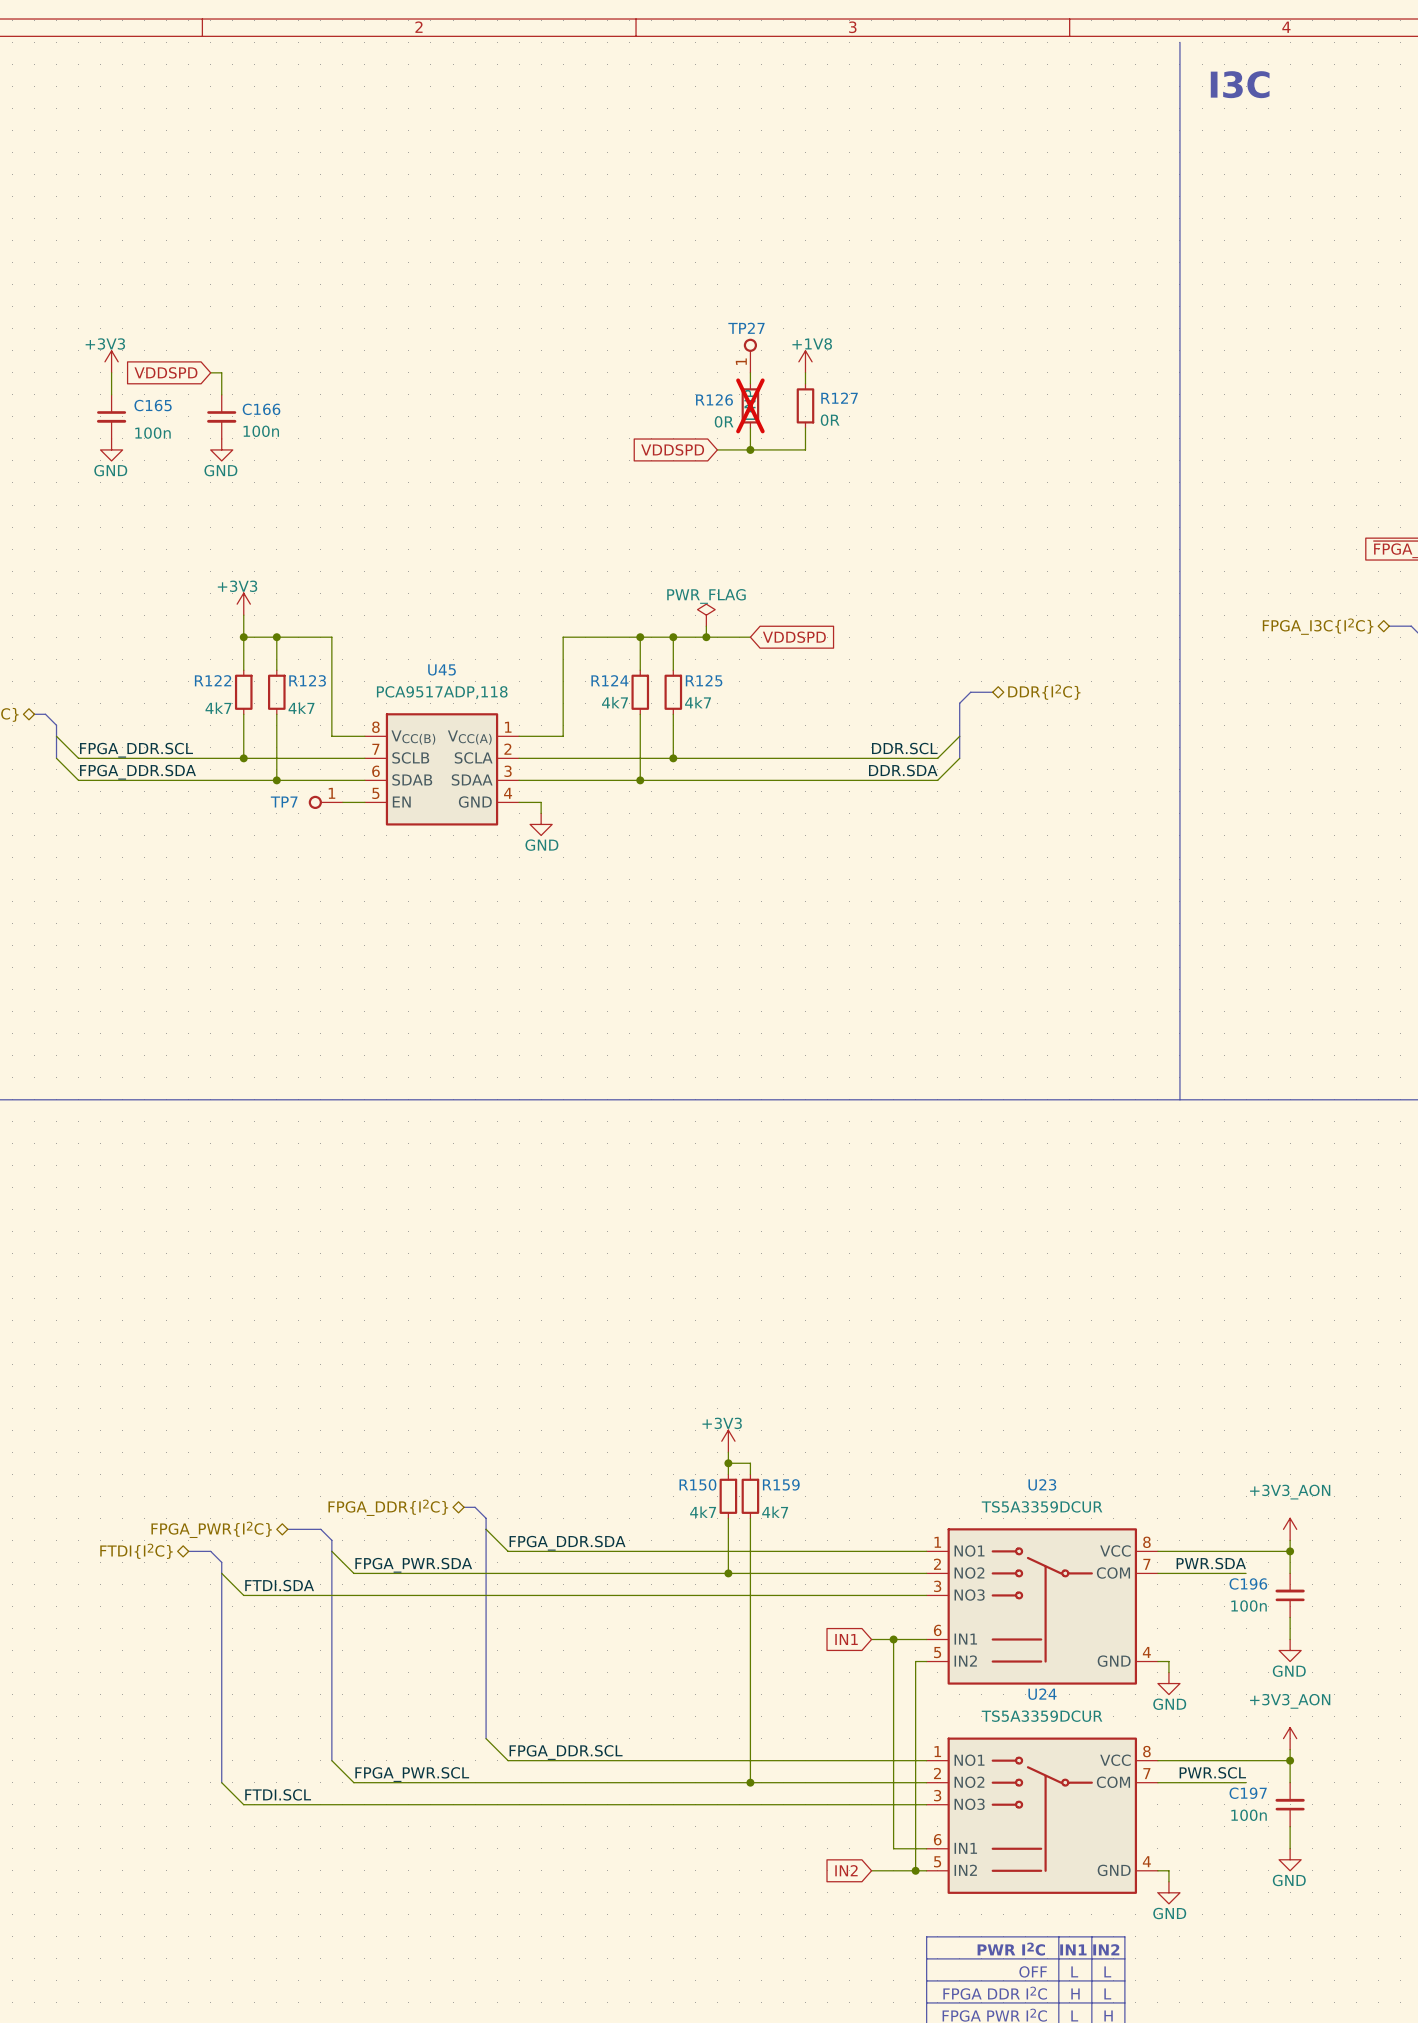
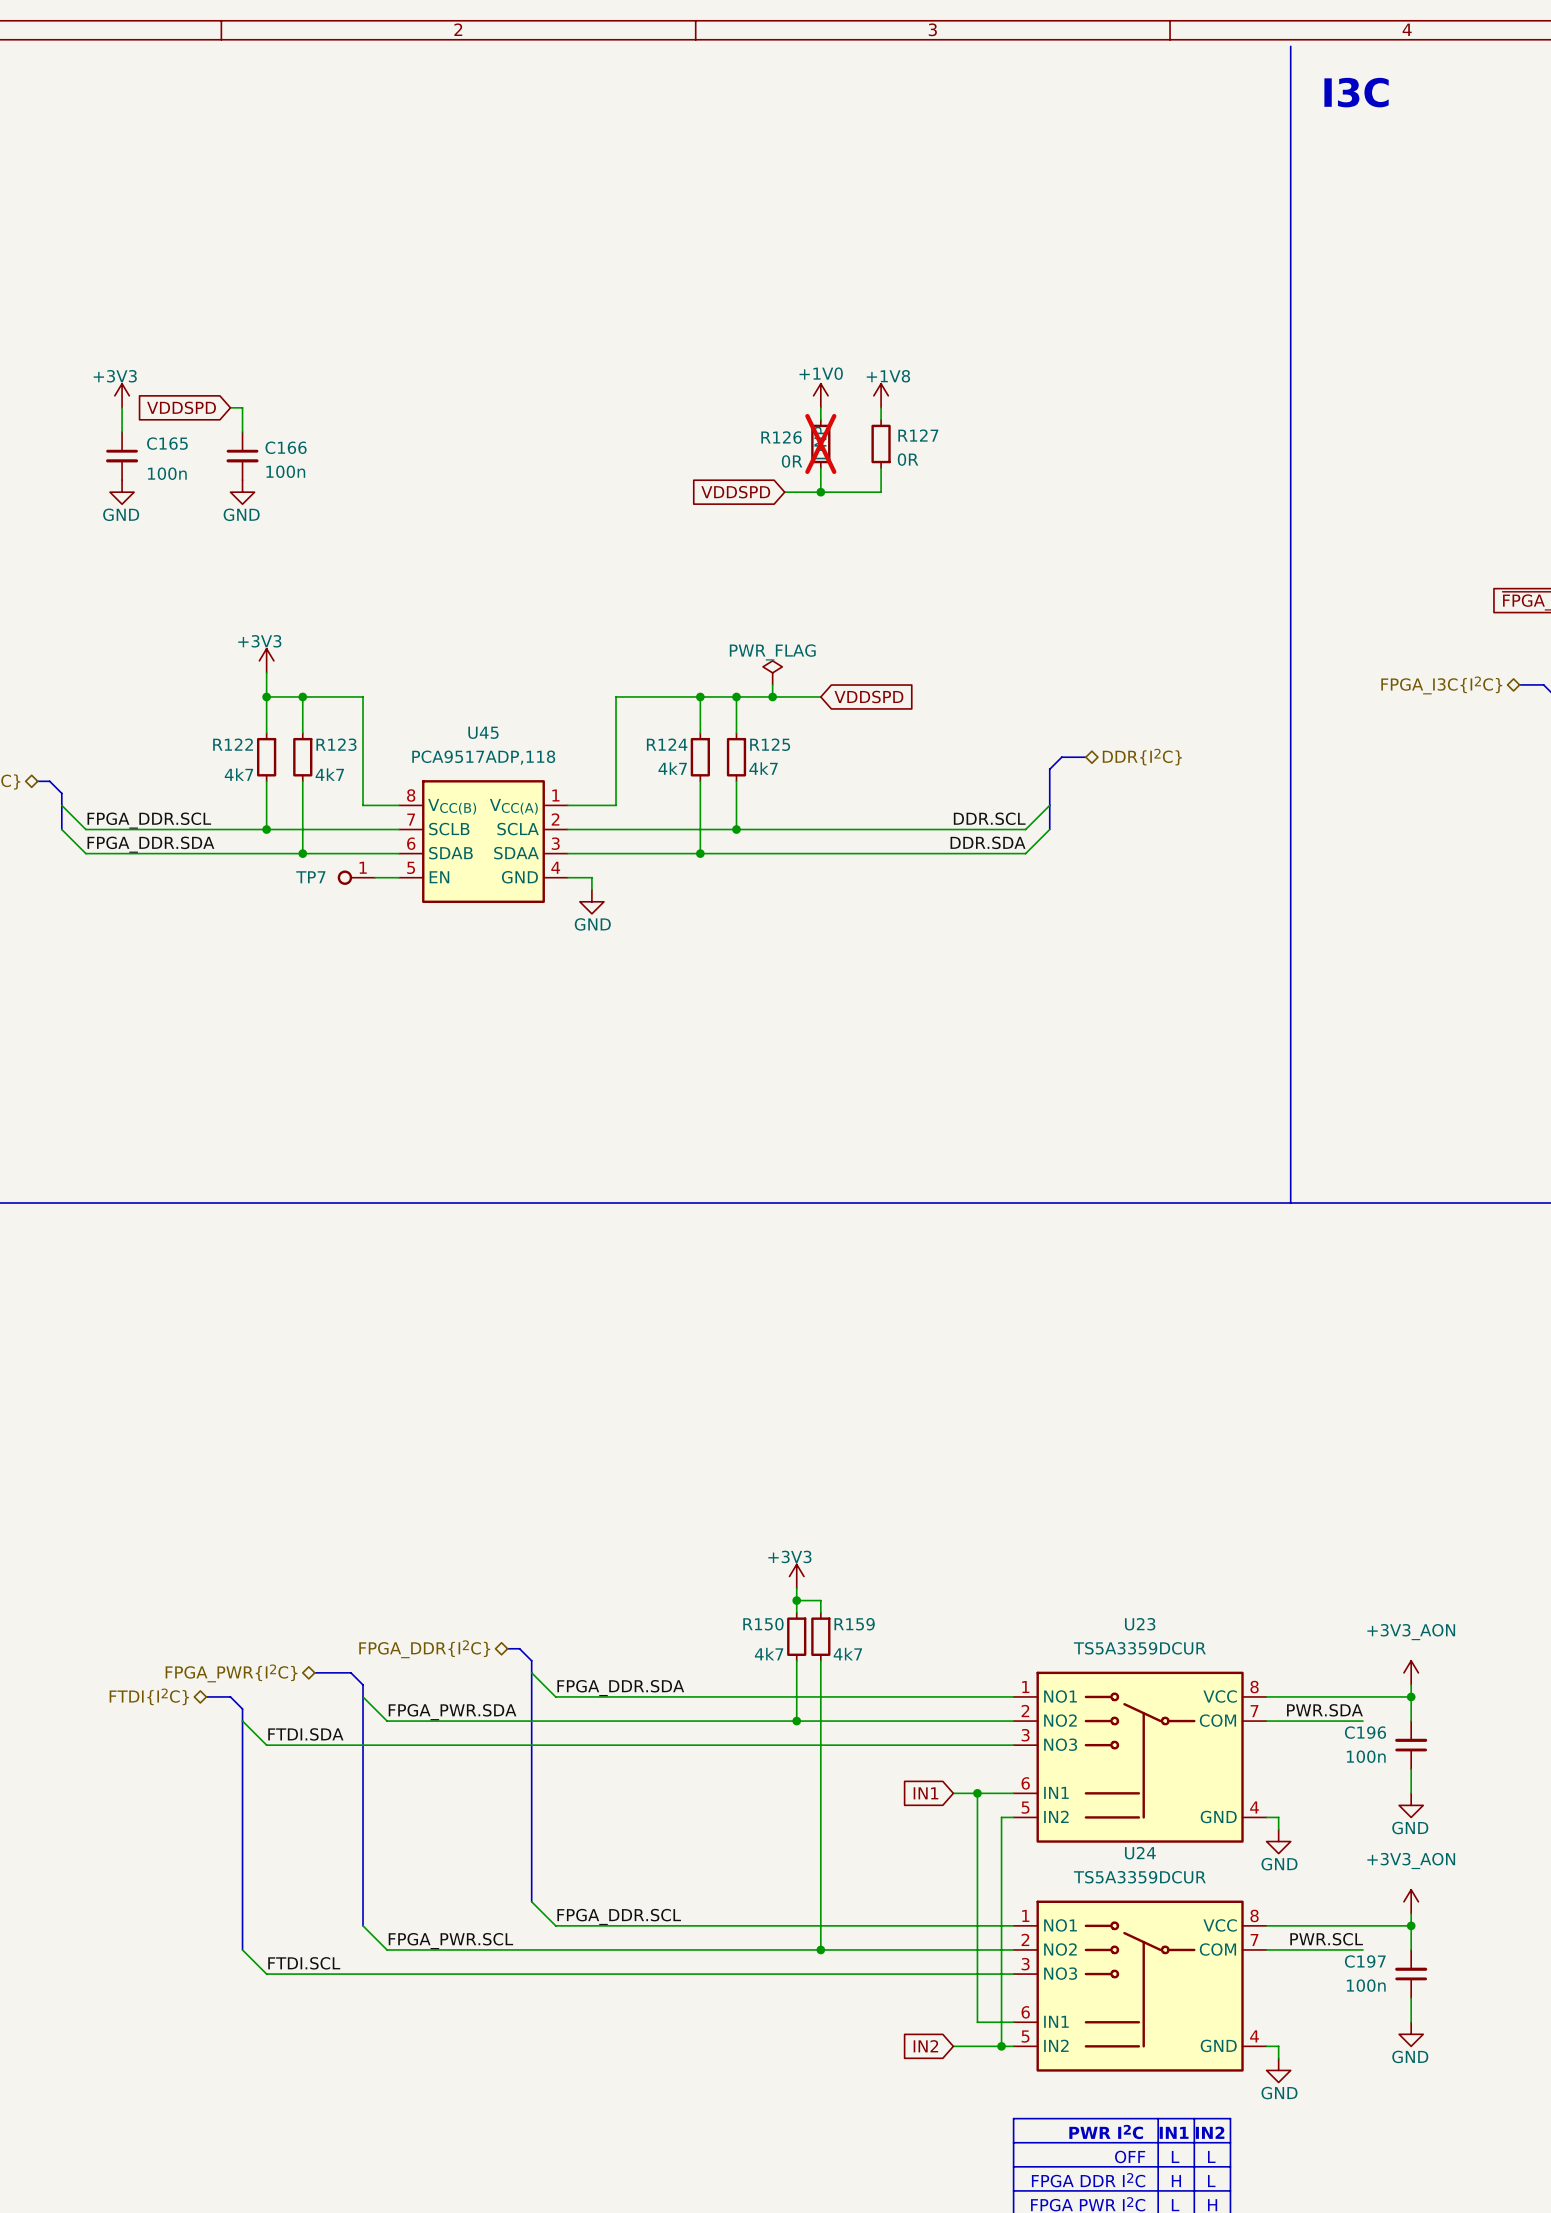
TP27: (750, 355) -> none
power symbol: none -> +1V0 (820, 395)

